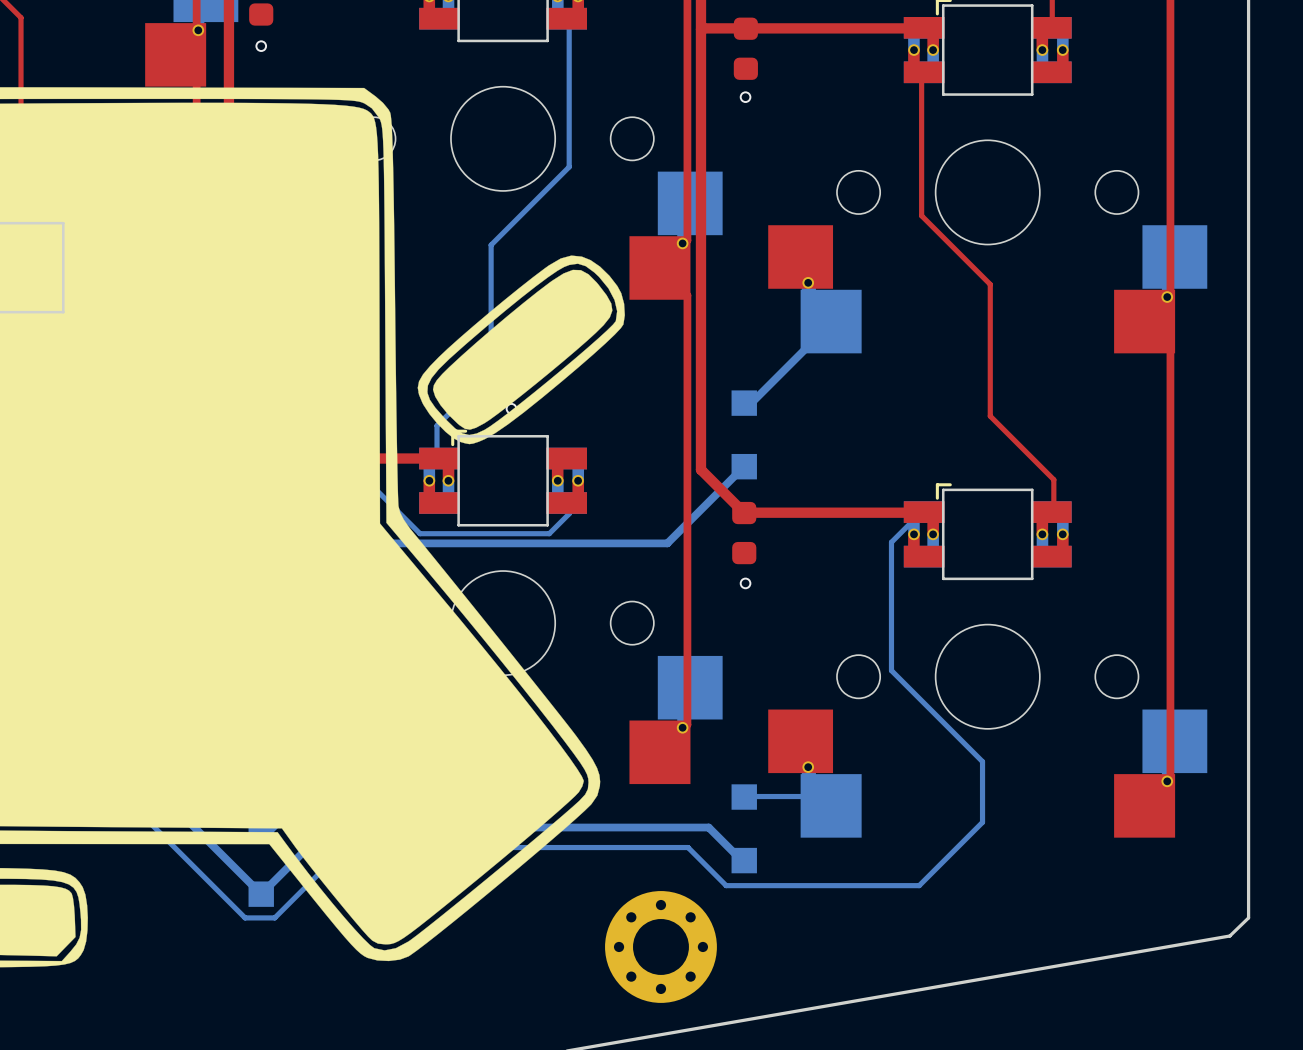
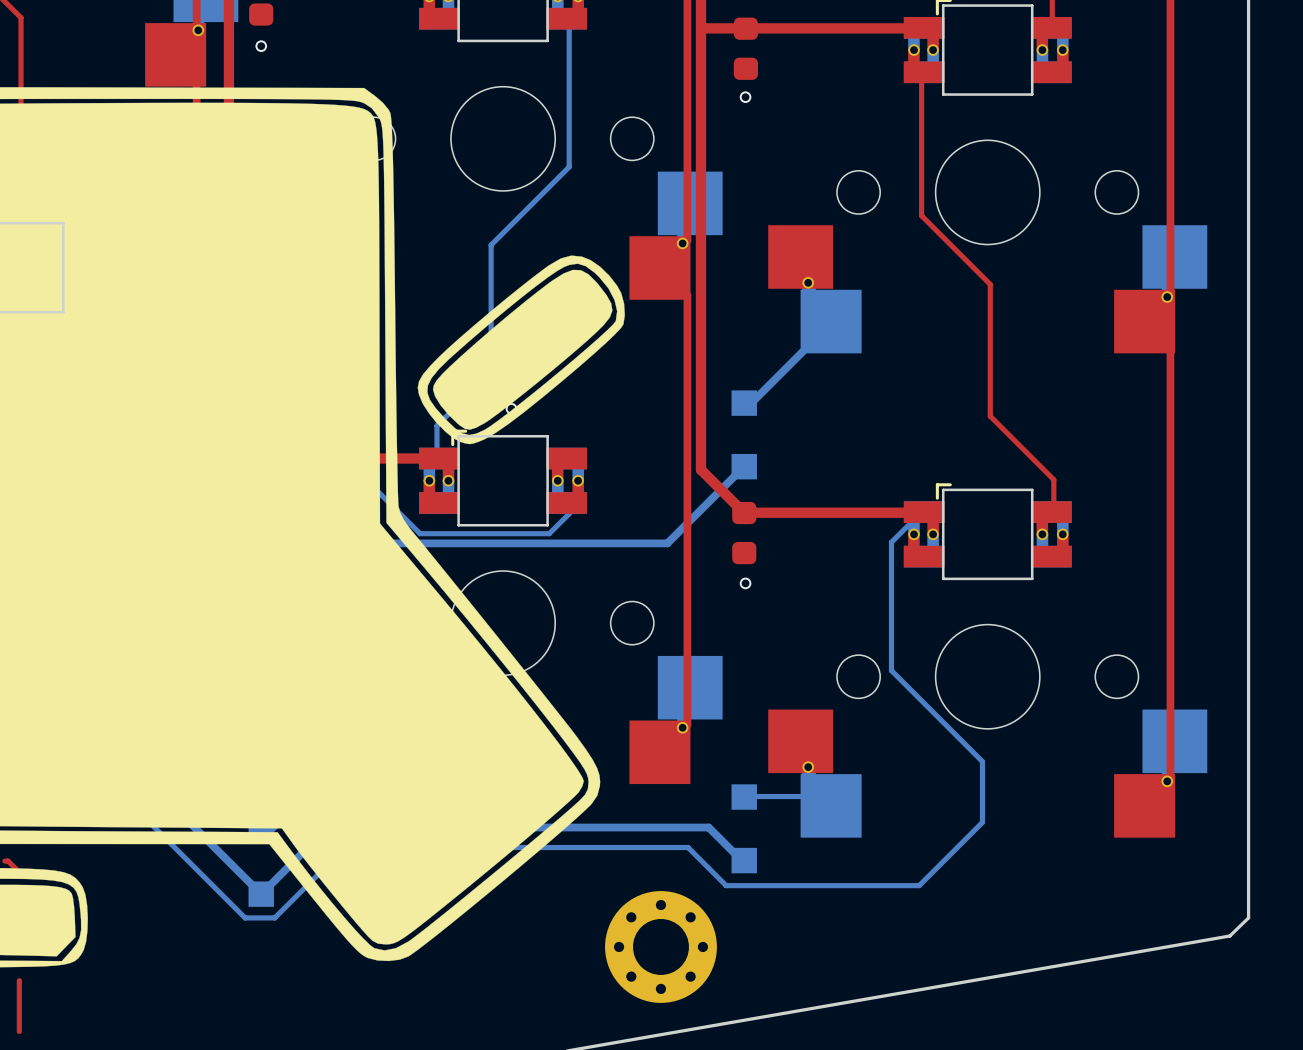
top track: none -> (4, 861) (8, 861) (19, 872)
top track: none -> (19, 980) (19, 1031)

